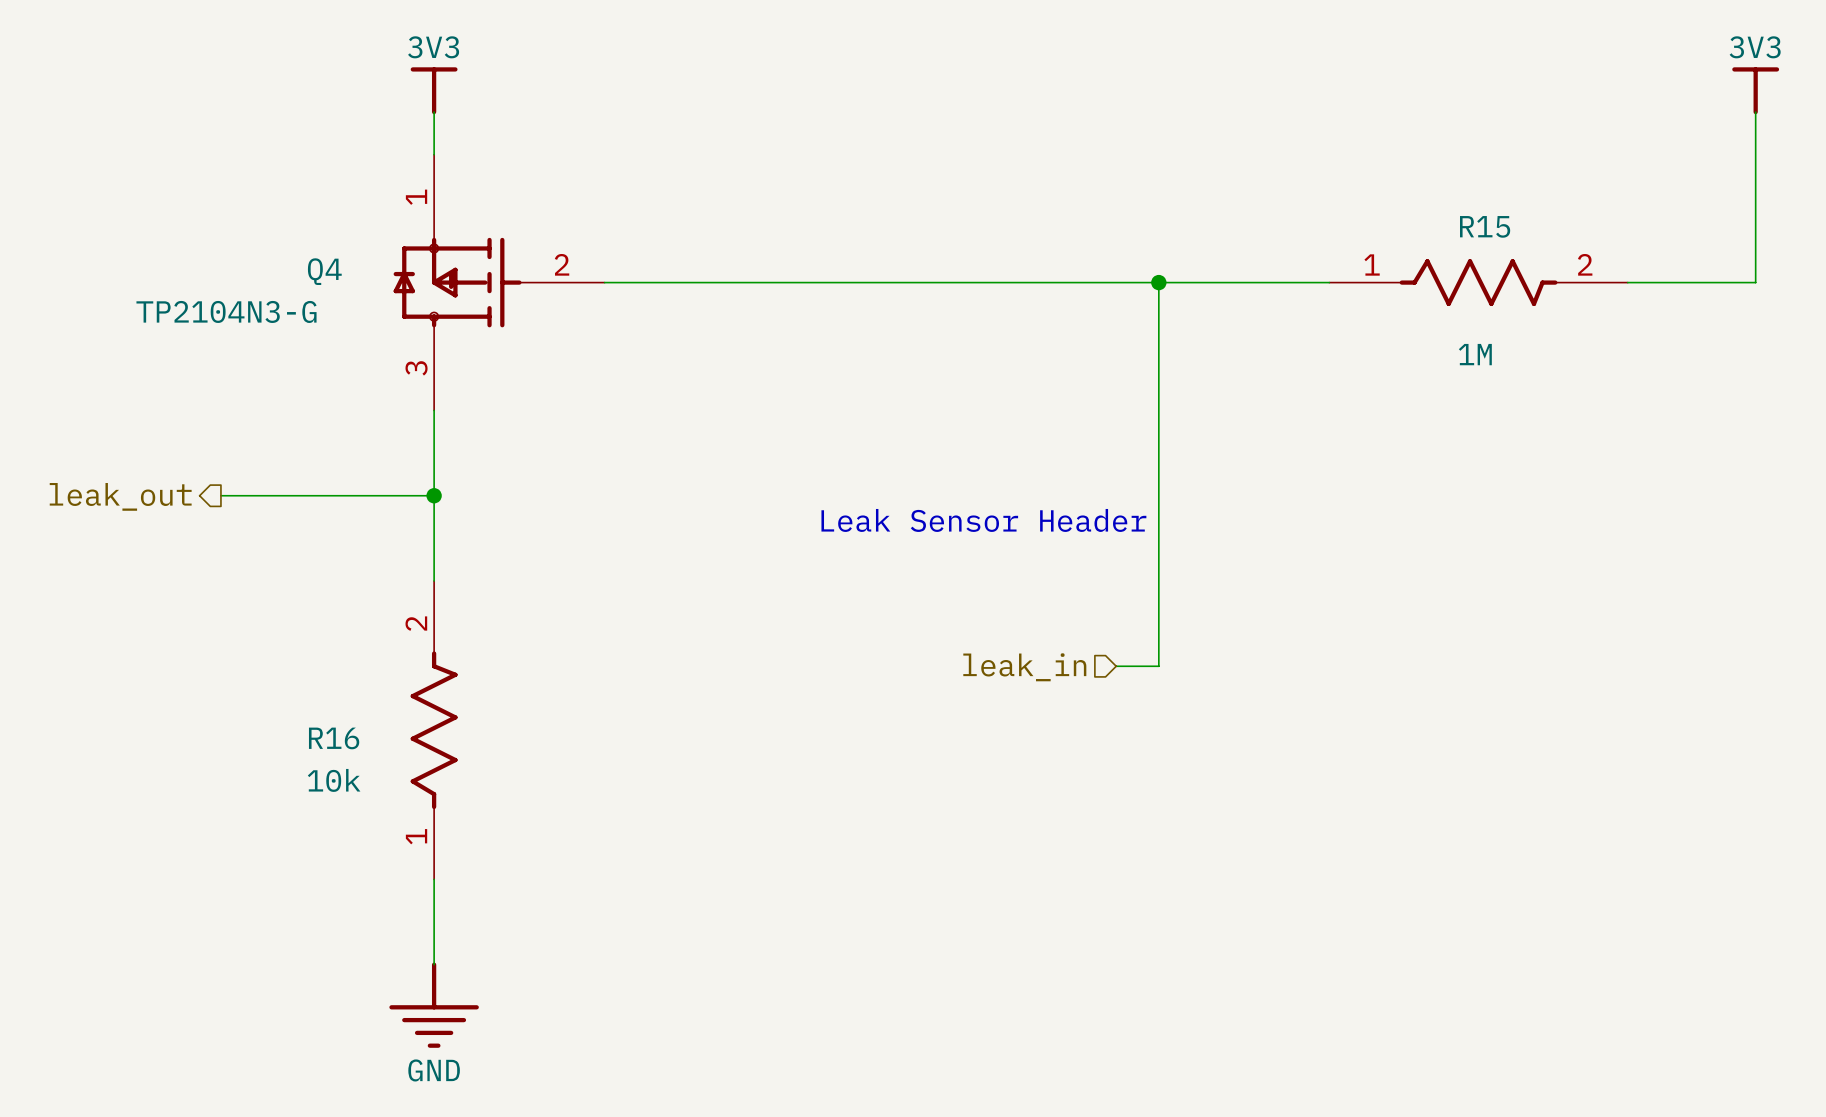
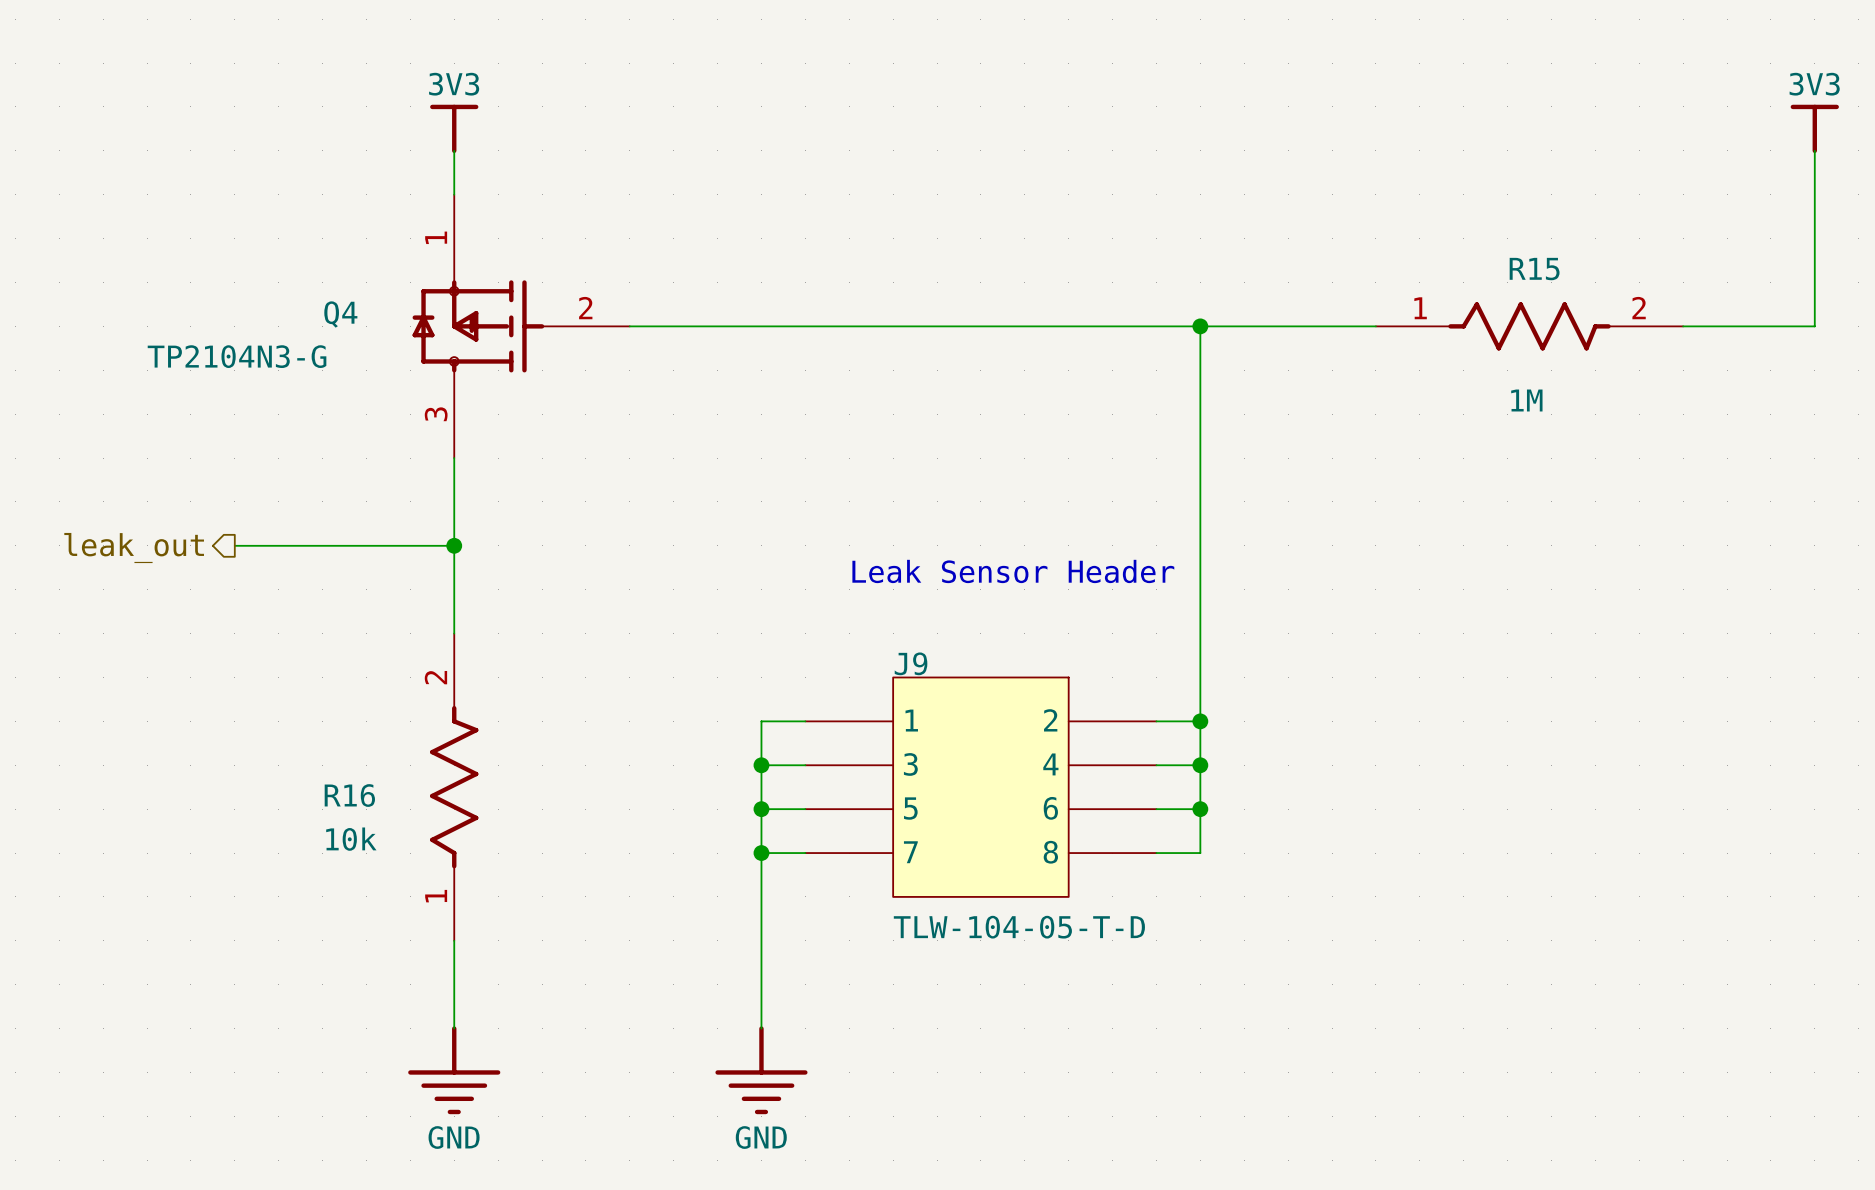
wire: none -> (805, 721) (761, 721) (761, 1028)
wire: none -> (1200, 721) (1200, 853) (1156, 853)
junction: none -> (1200, 721)
hierarchical label: leak_in (1024, 667) -> none
wire: none -> (761, 765) (805, 765)
junction: none -> (761, 765)
wire: none -> (1156, 765) (1200, 765)
junction: none -> (1200, 765)
J9: none -> TLW-104-05-T-D (980, 787)
wire: none -> (761, 809) (805, 809)
junction: none -> (761, 809)
wire: none -> (1156, 809) (1200, 809)
junction: none -> (1200, 809)
wire: none -> (761, 853) (805, 853)
junction: none -> (761, 853)
power symbol: none -> GND (761, 1070)

